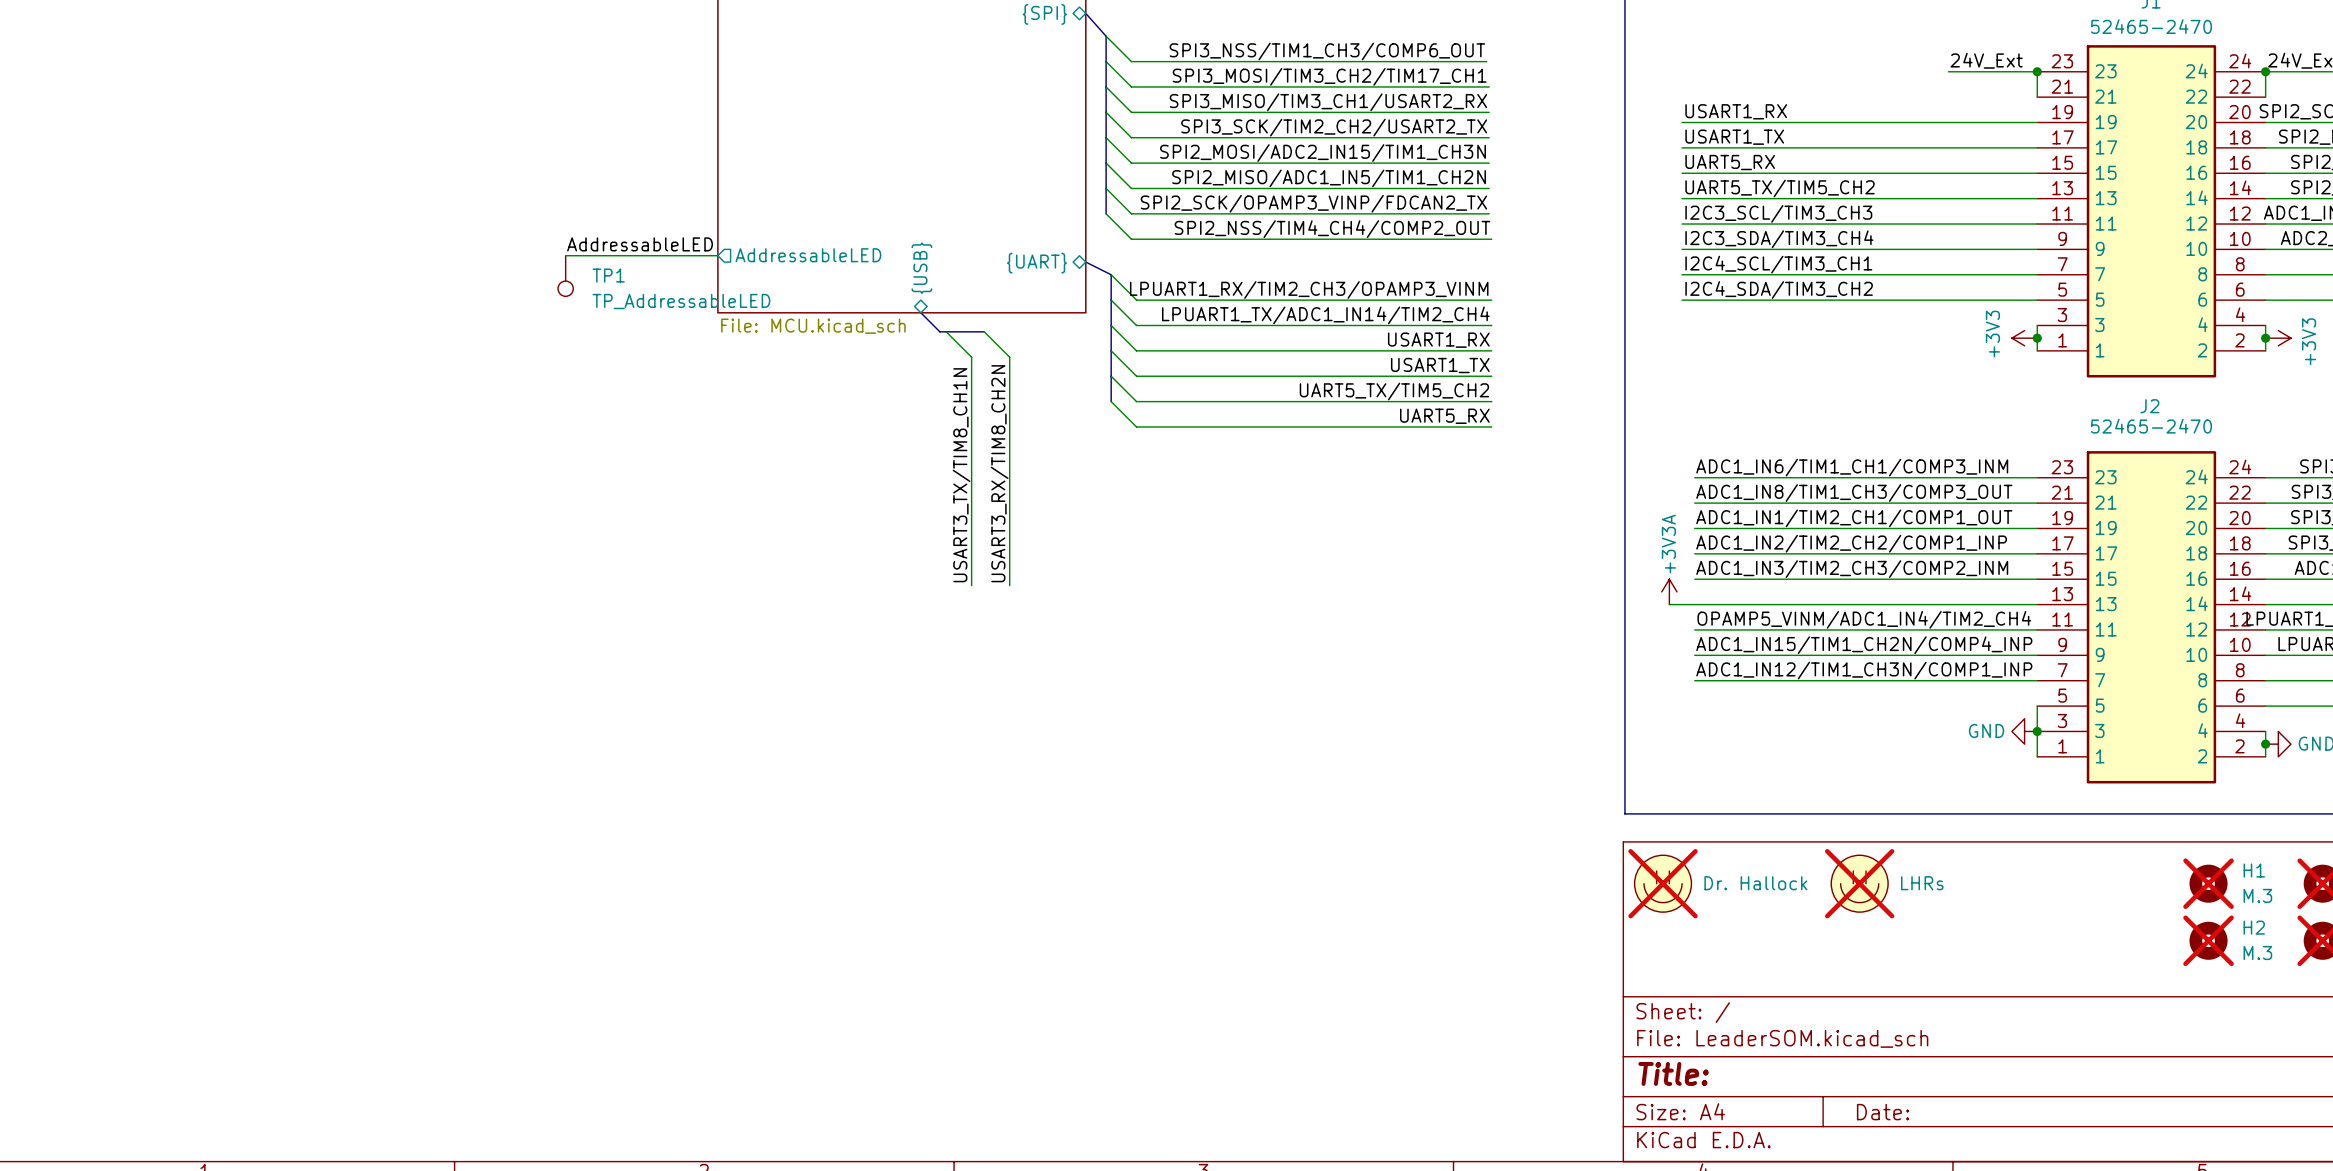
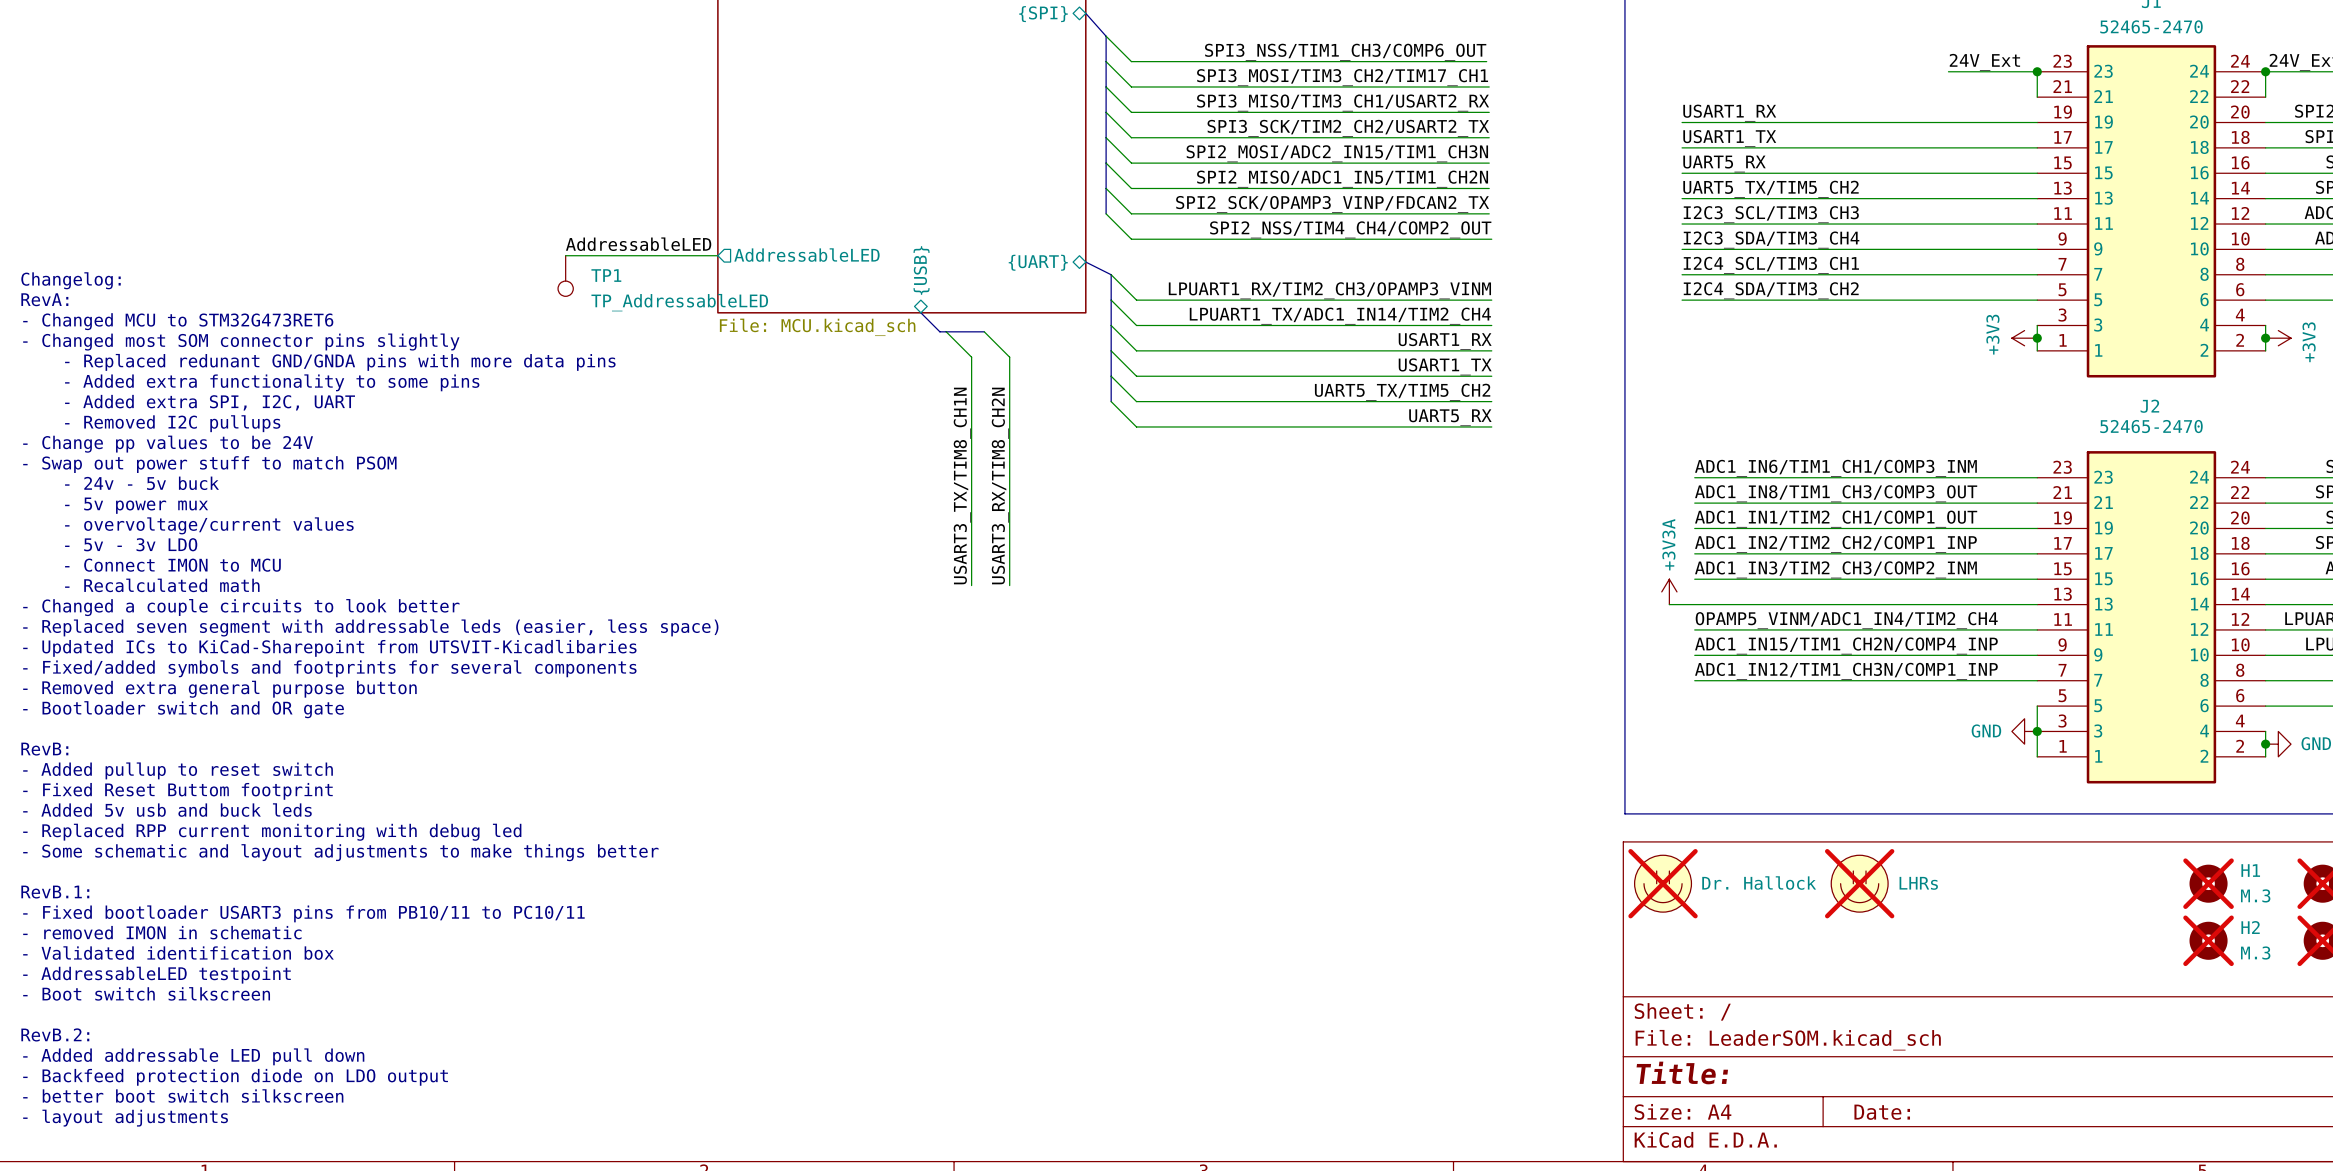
text: none -> Changelog: (71, 280)
text: none -> RevA: (44, 299)
text: none -> - Changed MCU to STM32G473RET6 (178, 321)
text: none -> - Changed most SOM connector pins slightly (241, 342)
text: none -> - Replaced redunant GND/GNDA pins with more data pins (340, 362)
text: none -> - Added extra functionality to some pins (272, 382)
text: none -> - Added extra SPI, I2C, UART (210, 402)
text: none -> - Removed I2C pullups (172, 423)
text: none -> - Change pp values to be 24V (168, 444)
text: none -> - Swap out power stuff to match PSOM (209, 464)
text: none -> - 24v - 5v buck (142, 483)
text: none -> - 5v power mux (136, 505)
text: none -> - overvoltage/current values (209, 525)
text: none -> - 5v - 3v LDO (131, 544)
text: none -> - Connect IMON to MCU (172, 565)
text: none -> - Recalculated math (162, 585)
text: none -> - Changed a couple circuits to look better (241, 607)
text: none -> - Replaced seven segment with addressable leds (easier, less space) (370, 627)
text: none -> - Updated ICs to KiCad-Sharepoint from UTSVIT-Kicadlibaries (329, 648)
text: none -> - Fixed/added symbols and footprints for several components (329, 668)
text: none -> - Removed extra general purpose button (219, 689)
text: none -> - Bootloader switch and OR gate (183, 709)
text: none -> RevB: (44, 749)
text: none -> - Added pullup to reset switch (178, 770)
text: none -> - Fixed Reset Buttom footprint (177, 791)
text: none -> - Added 5v usb and buck leds (167, 810)
text: none -> - Replaced RPP current monitoring with debug led (272, 832)
text: none -> - Some schematic and layout adjustments to make things better (340, 852)
text: none -> RevB.1: (55, 892)
text: none -> - Fixed bootloader USART3 pins from PB10/11 to PC10/11 (303, 913)
text: none -> - removed IMON in schematic (162, 932)
text: none -> - Validated identification box (178, 953)
text: none -> - AddressableLED testpoint (157, 975)
text: none -> - Boot switch silkscreen (146, 993)
text: none -> RevB.2: (55, 1034)
text: none -> - Added addressable LED pull down (193, 1056)
text: none -> - Backfeed protection diode on LDO output (235, 1077)
text: none -> - better boot switch silkscreen (183, 1096)
text: none -> - layout adjustments (125, 1118)

